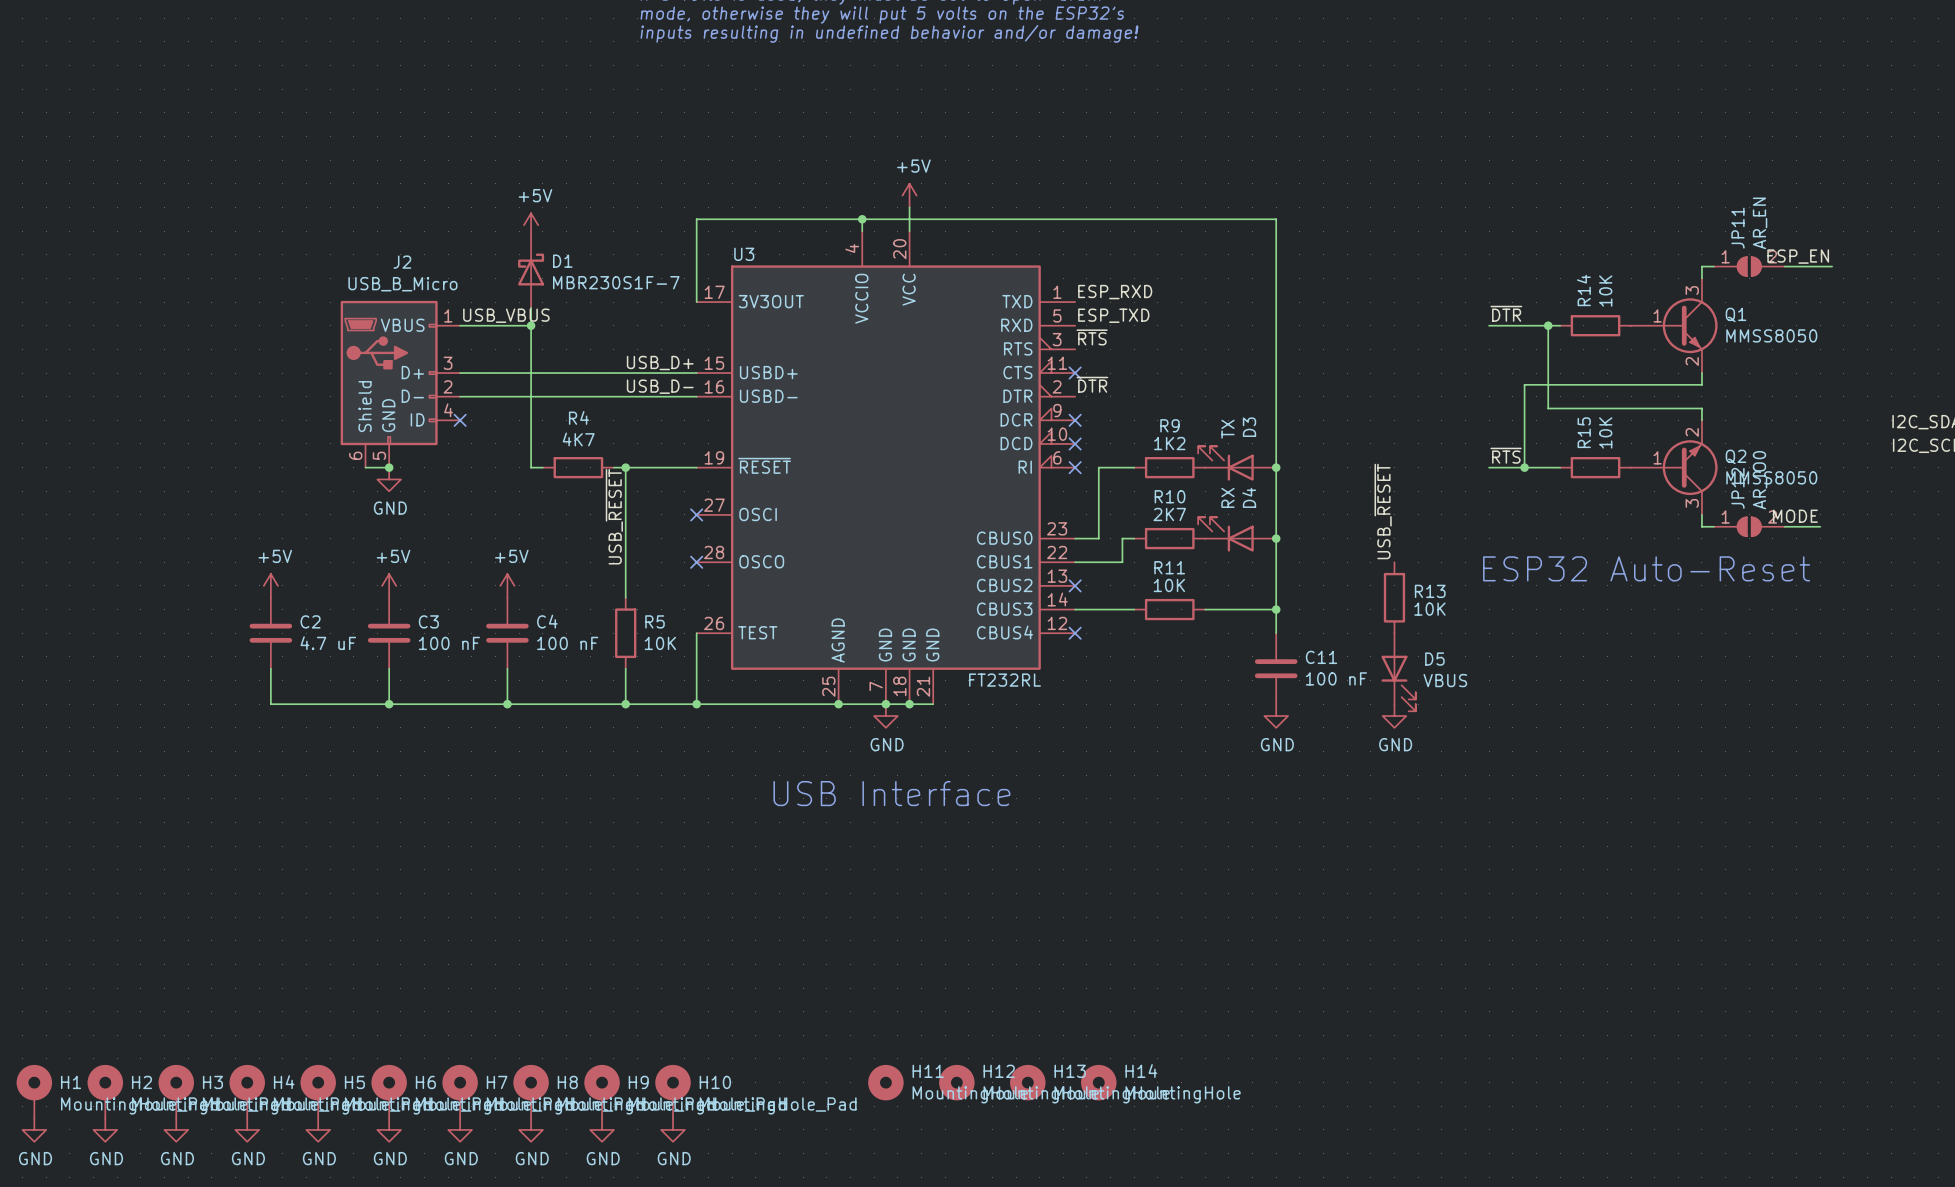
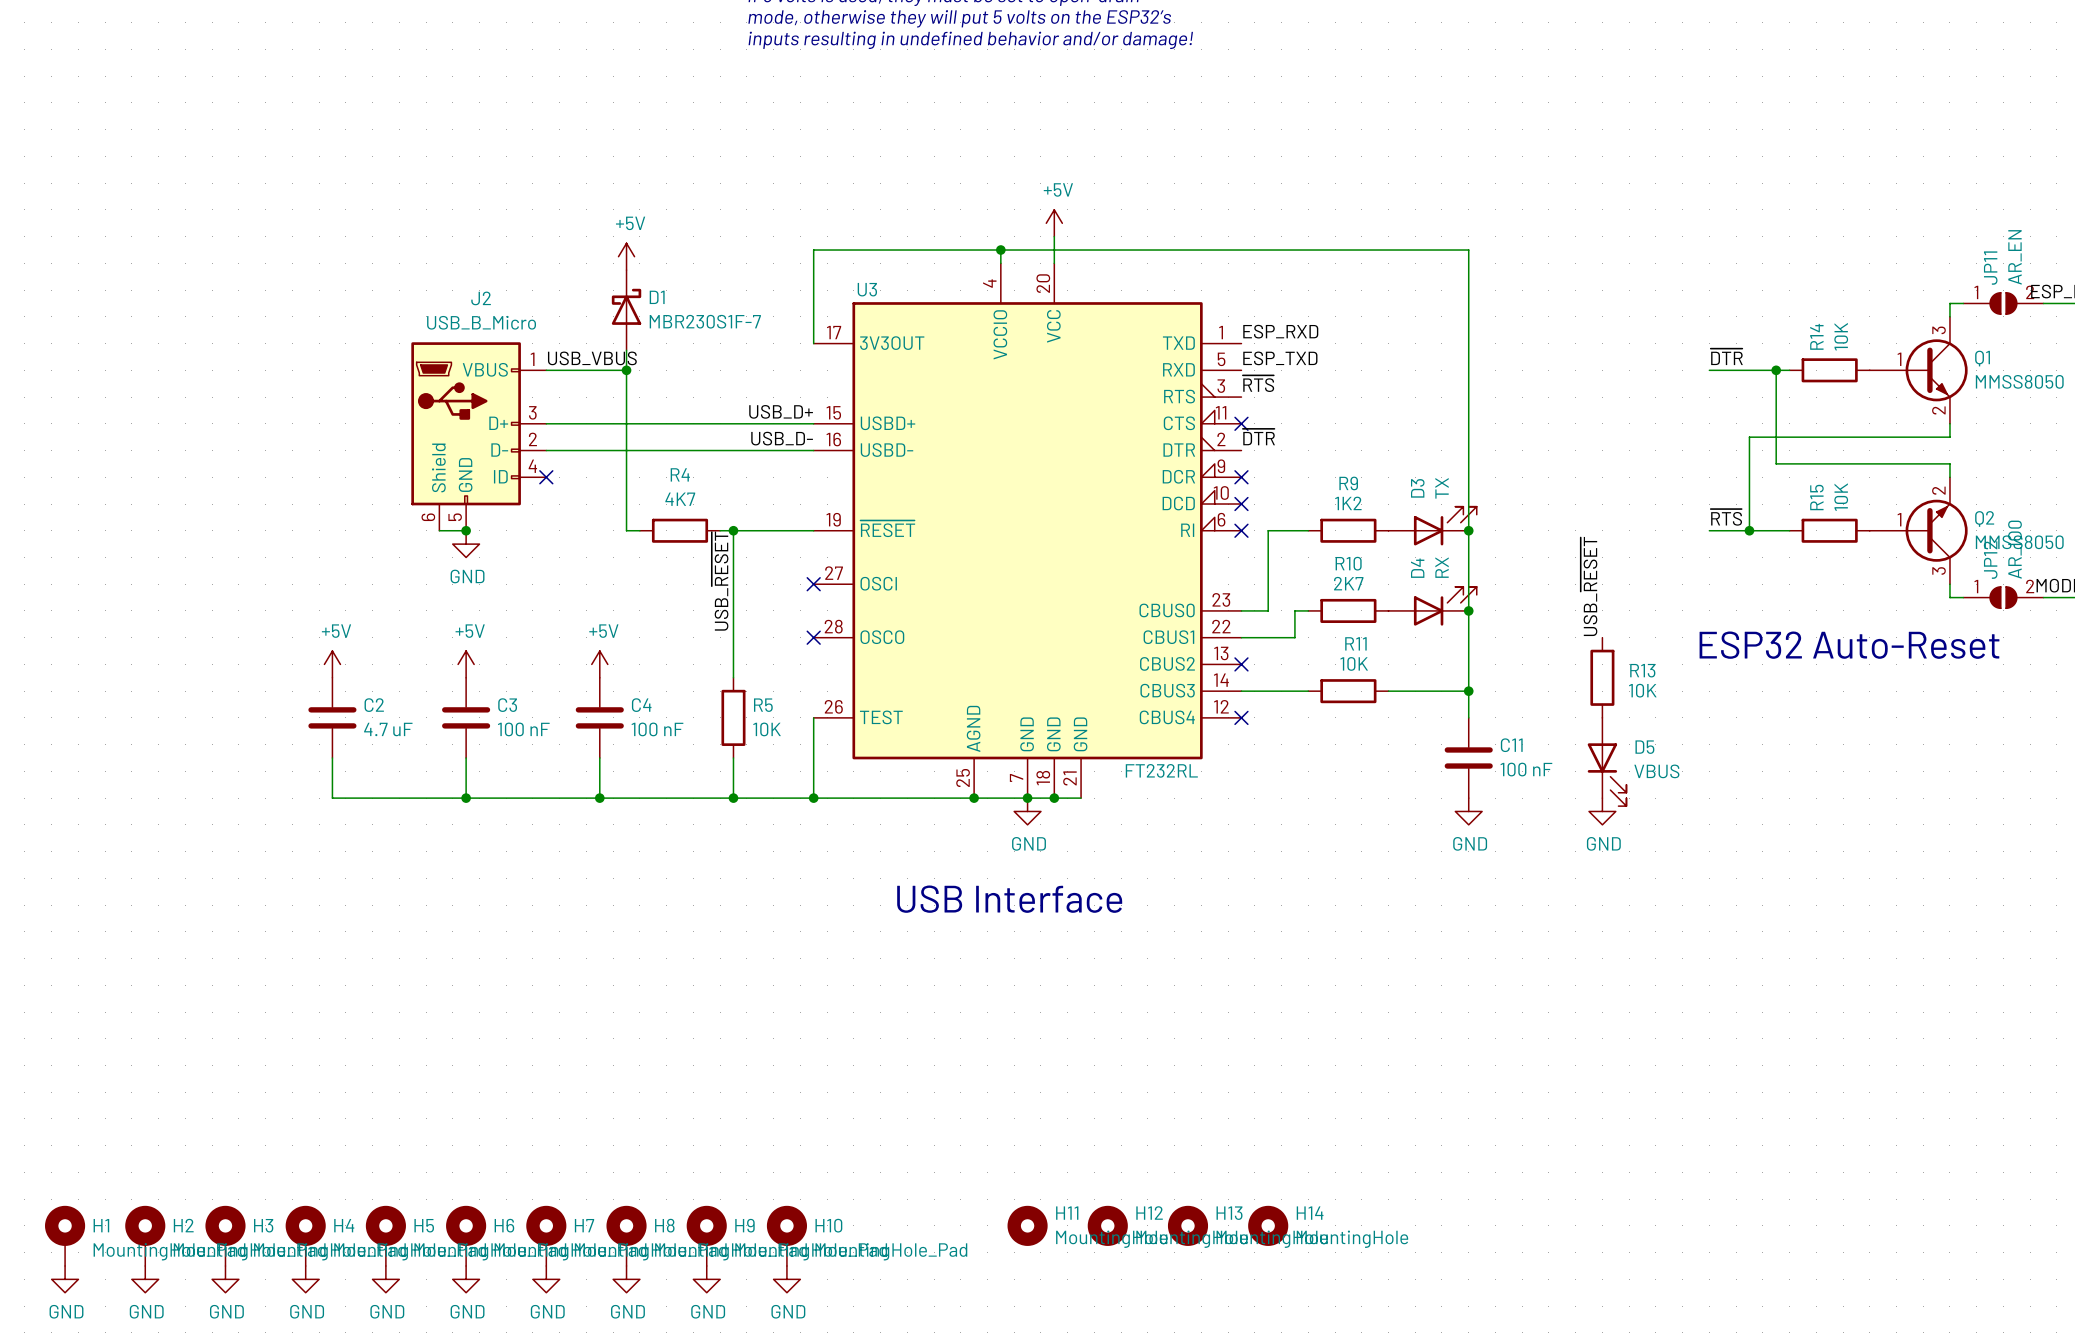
D3 flip: as is (1225, 463) -> left-right (1445, 526)
D4 flip: as is (1225, 534) -> left-right (1445, 606)

